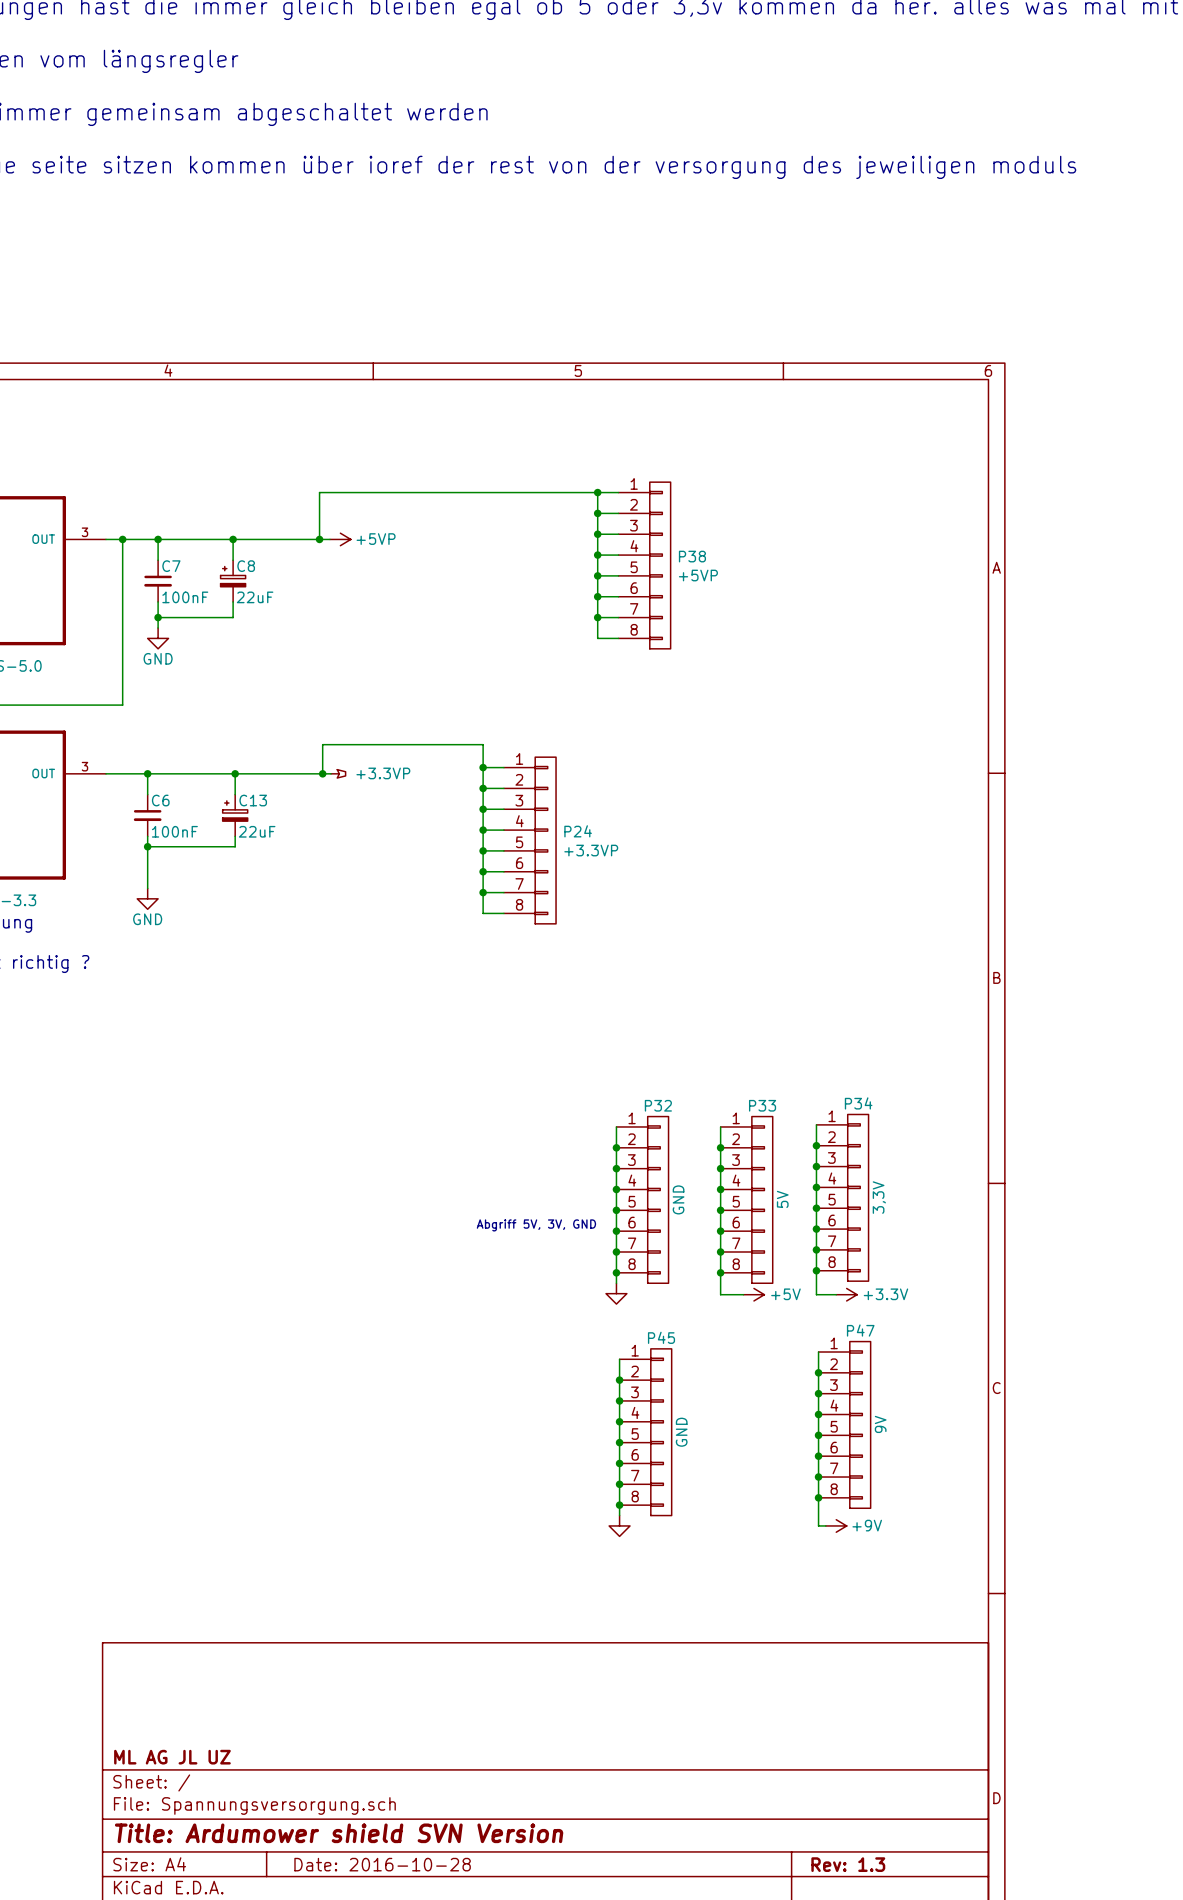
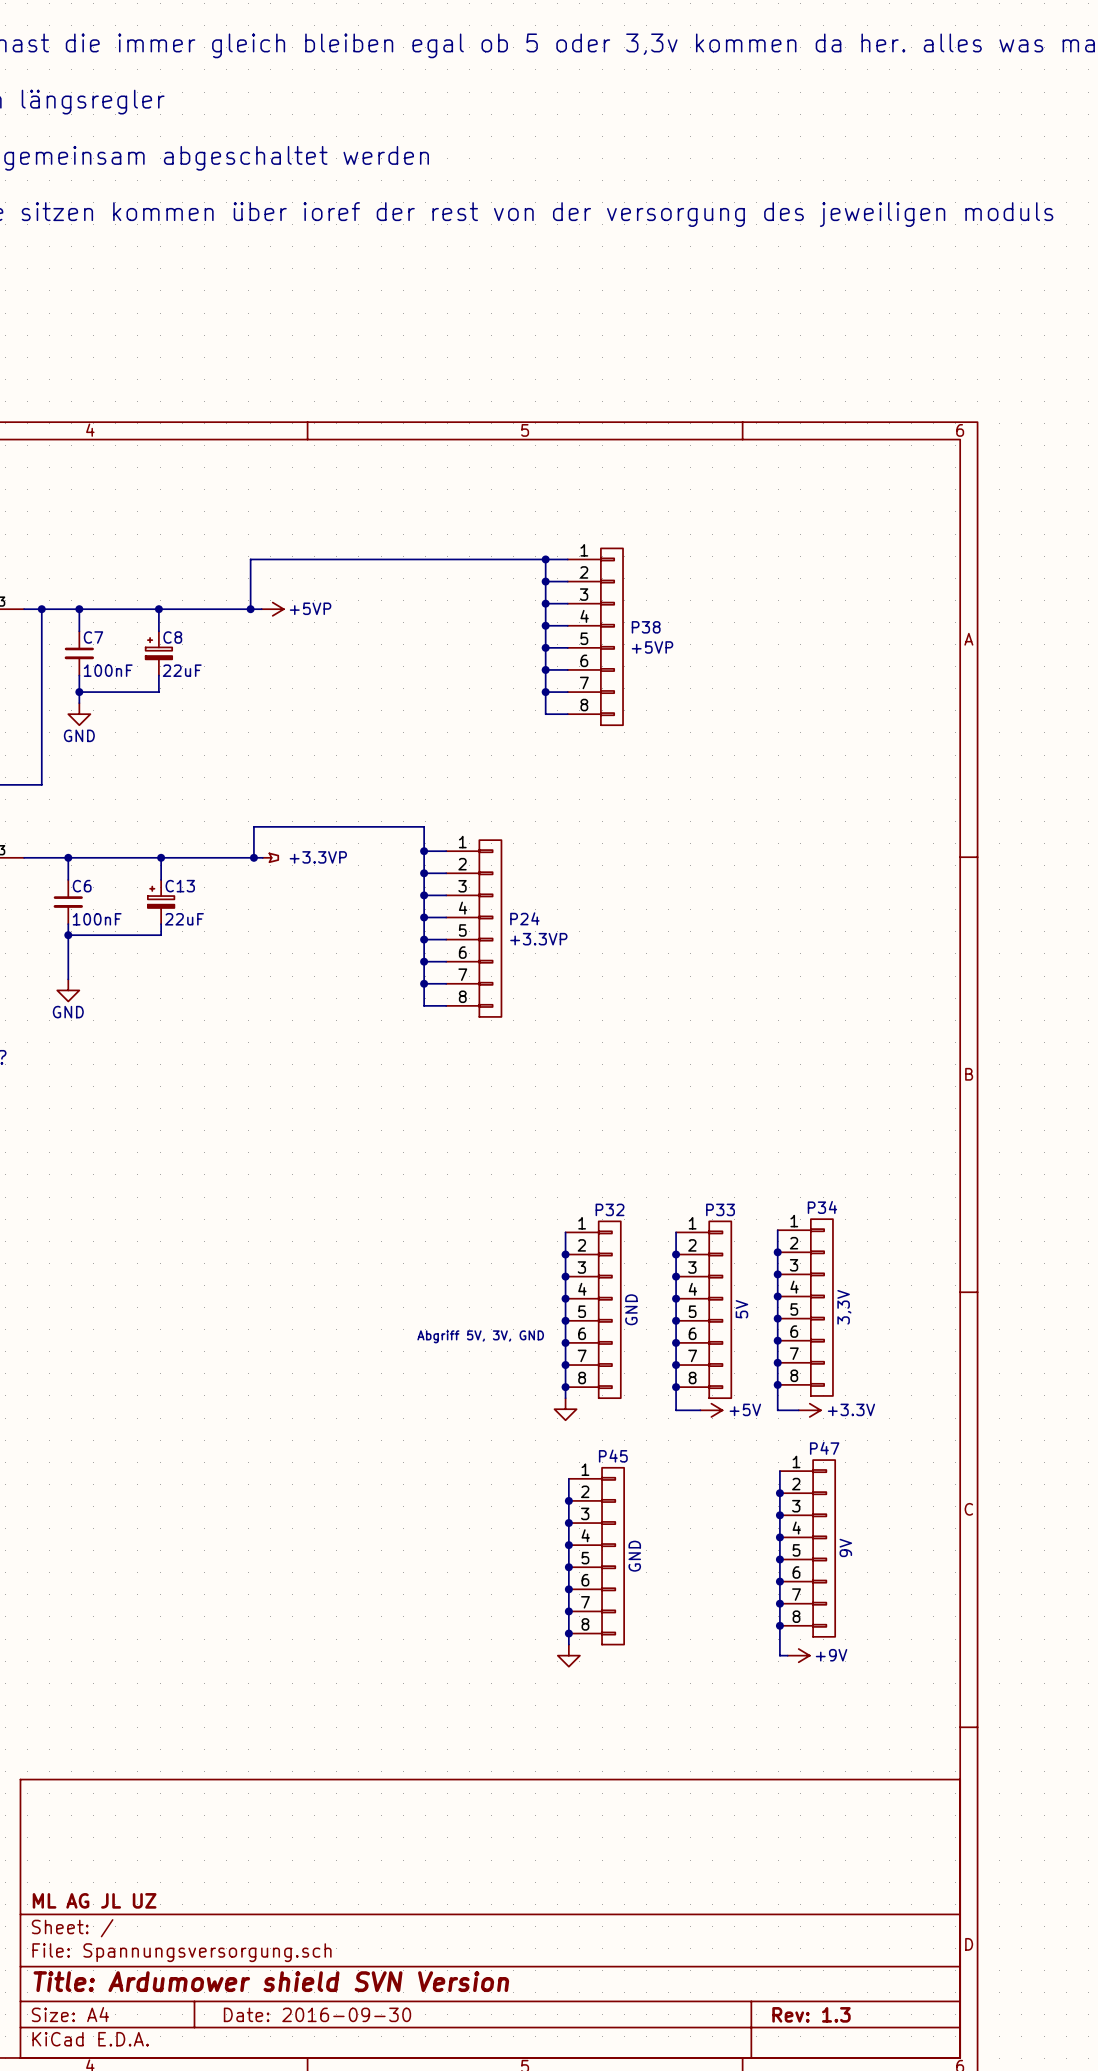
title block: Date: 2016-10-28 (382, 1864) -> Date: 2016-09-30 (317, 2014)

